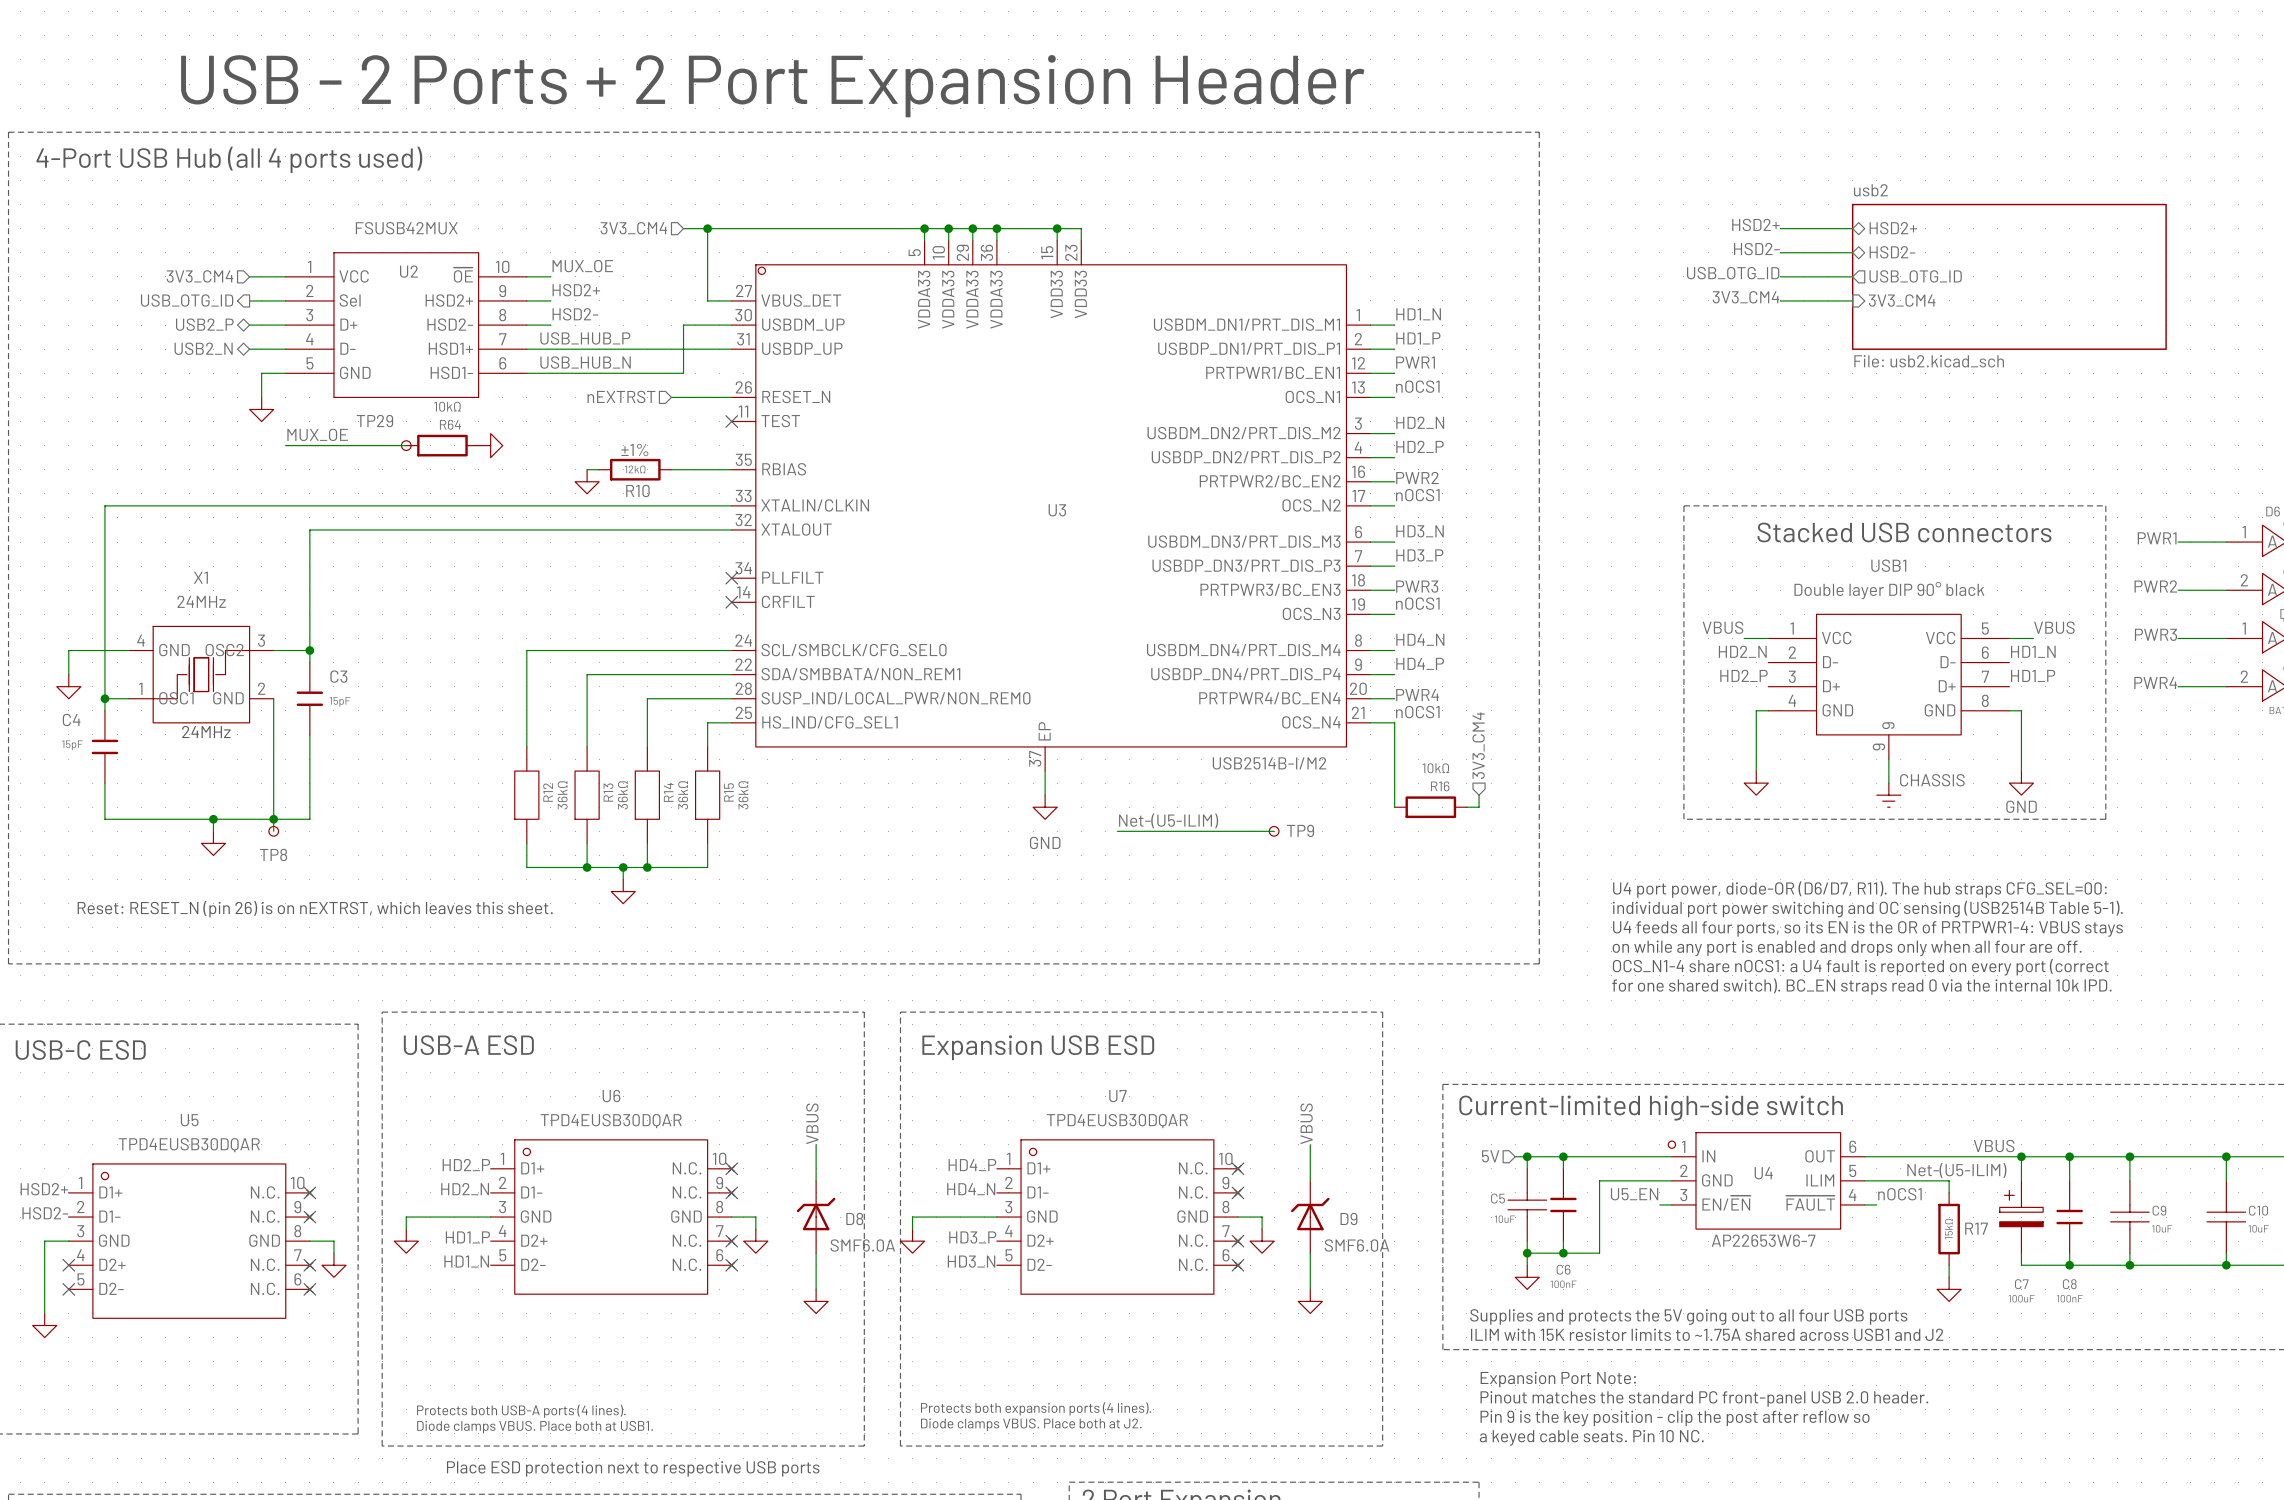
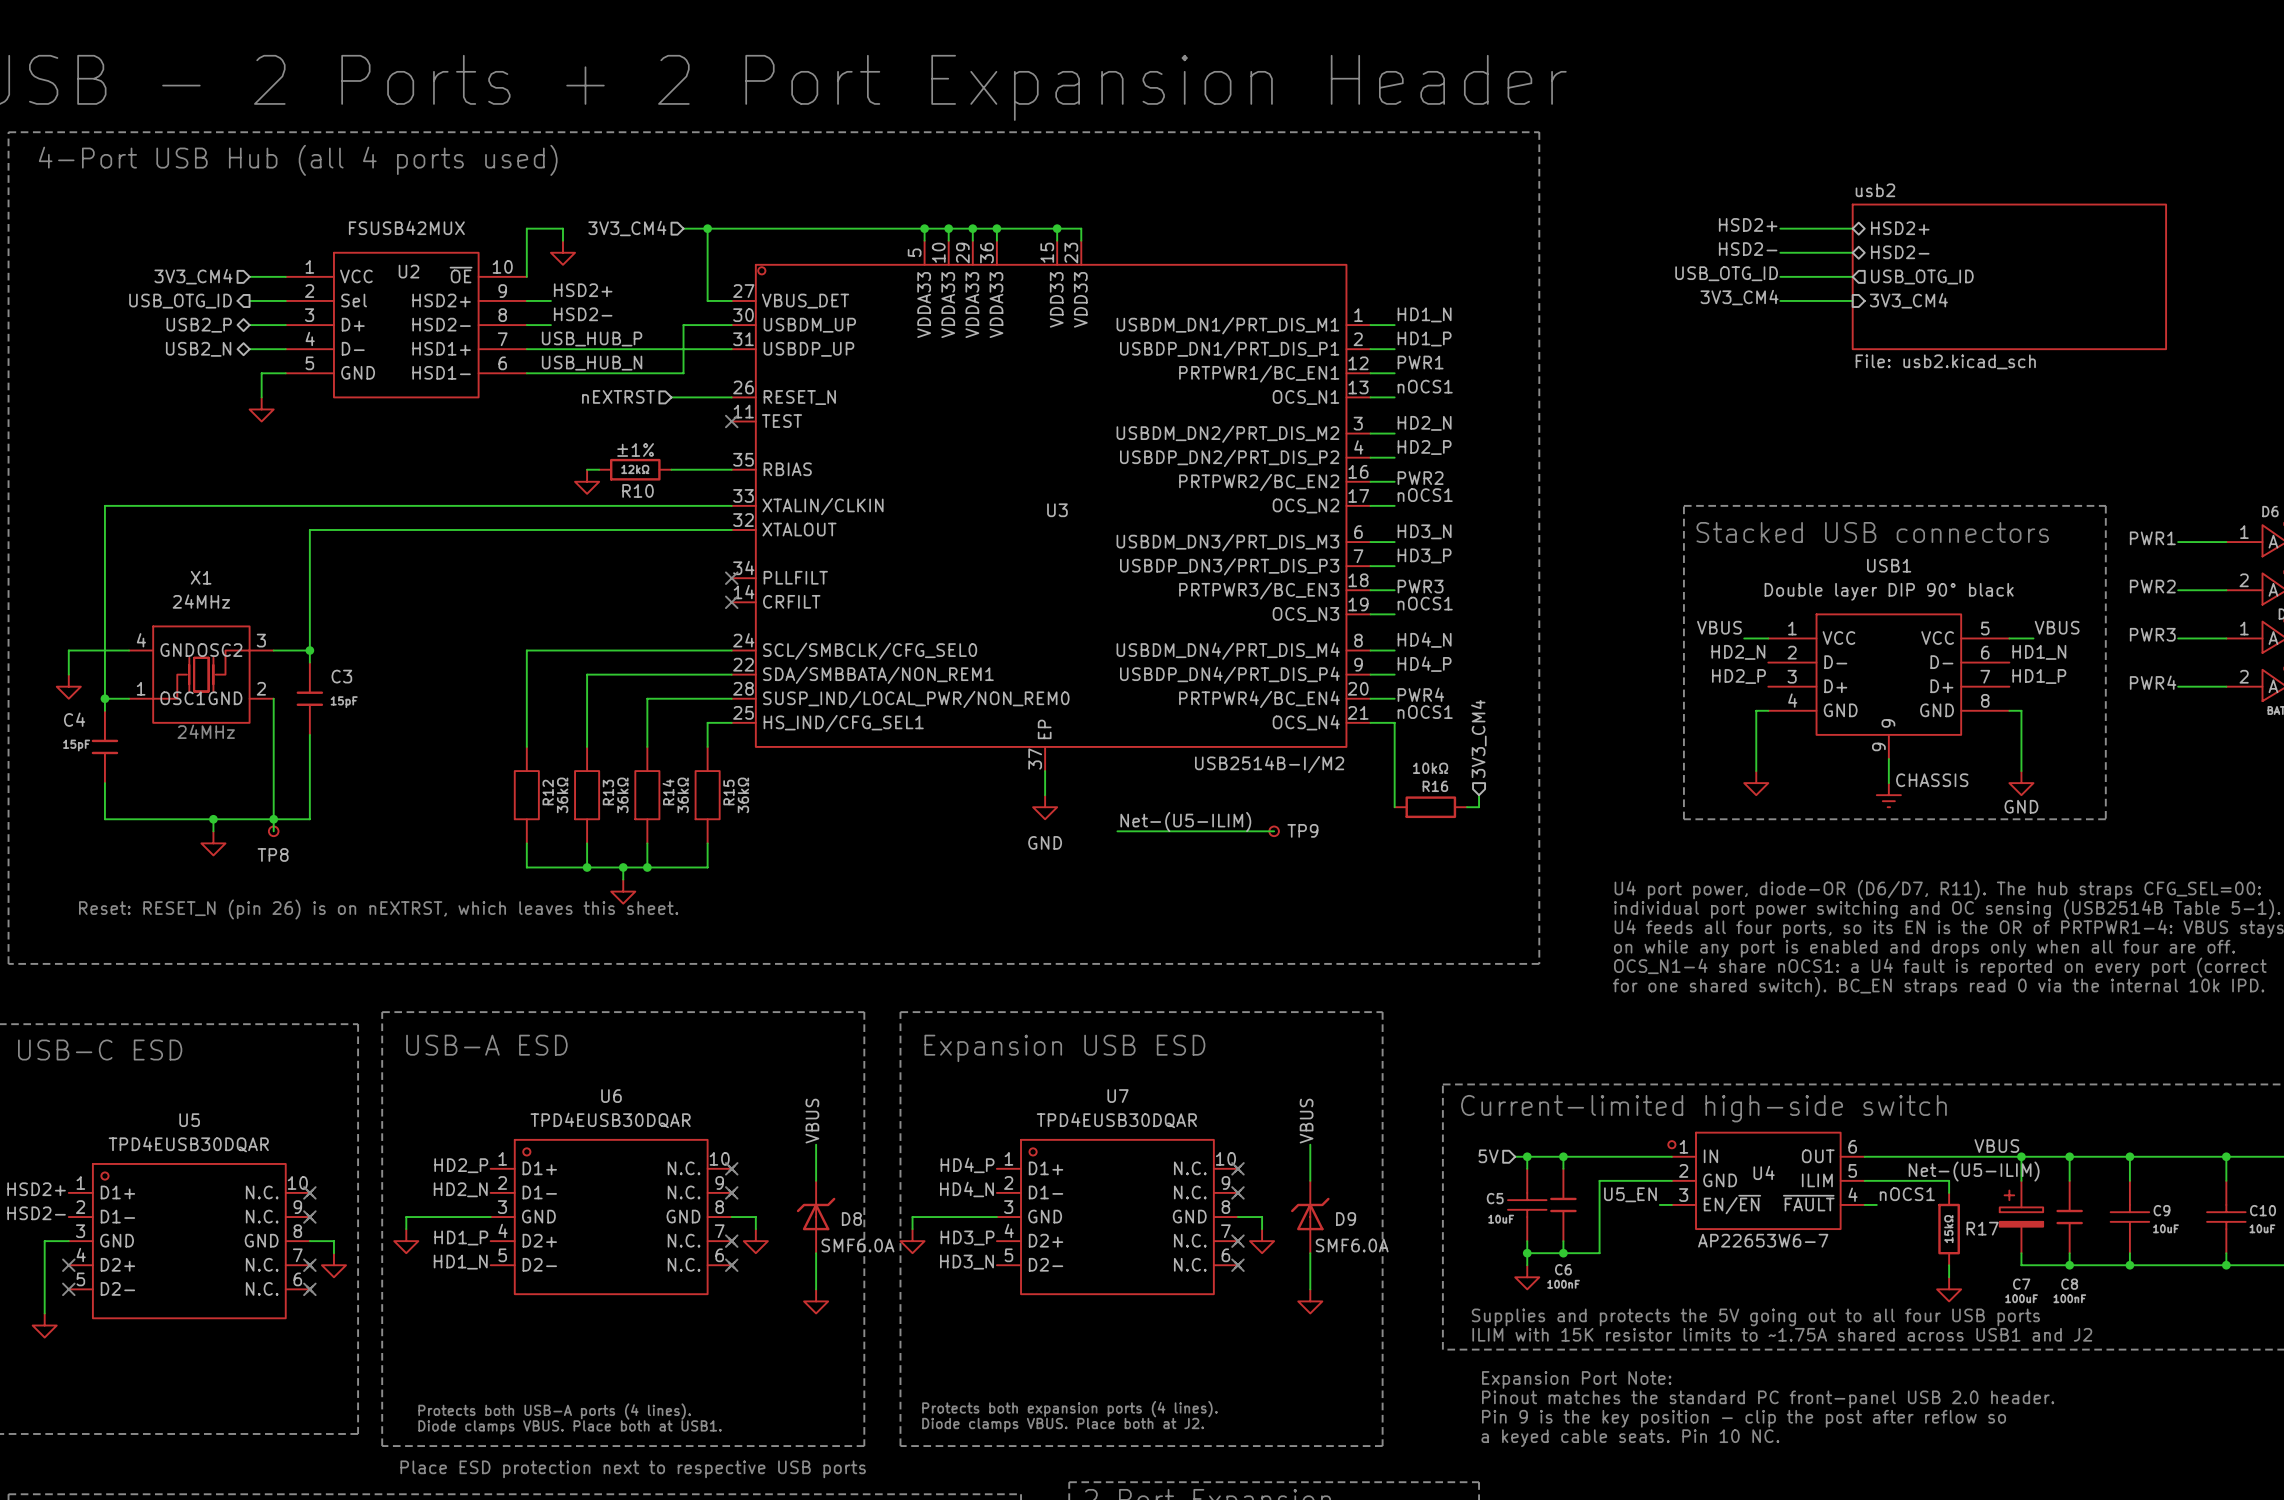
label: MUX_OE (582, 266) -> none
wire: (526, 276) (550, 276) -> (526, 276) (526, 228) (562, 228) (562, 240)
label: MUX_OE (317, 434) -> none
wire: (285, 445) (406, 445) -> none
TP29: (406, 445) -> none
R64: 10kΩ (442, 445) -> none
power symbol rotation: 0° (490, 445) -> 90° clockwise (562, 252)
power symbol position: (490, 445) -> (562, 252)

